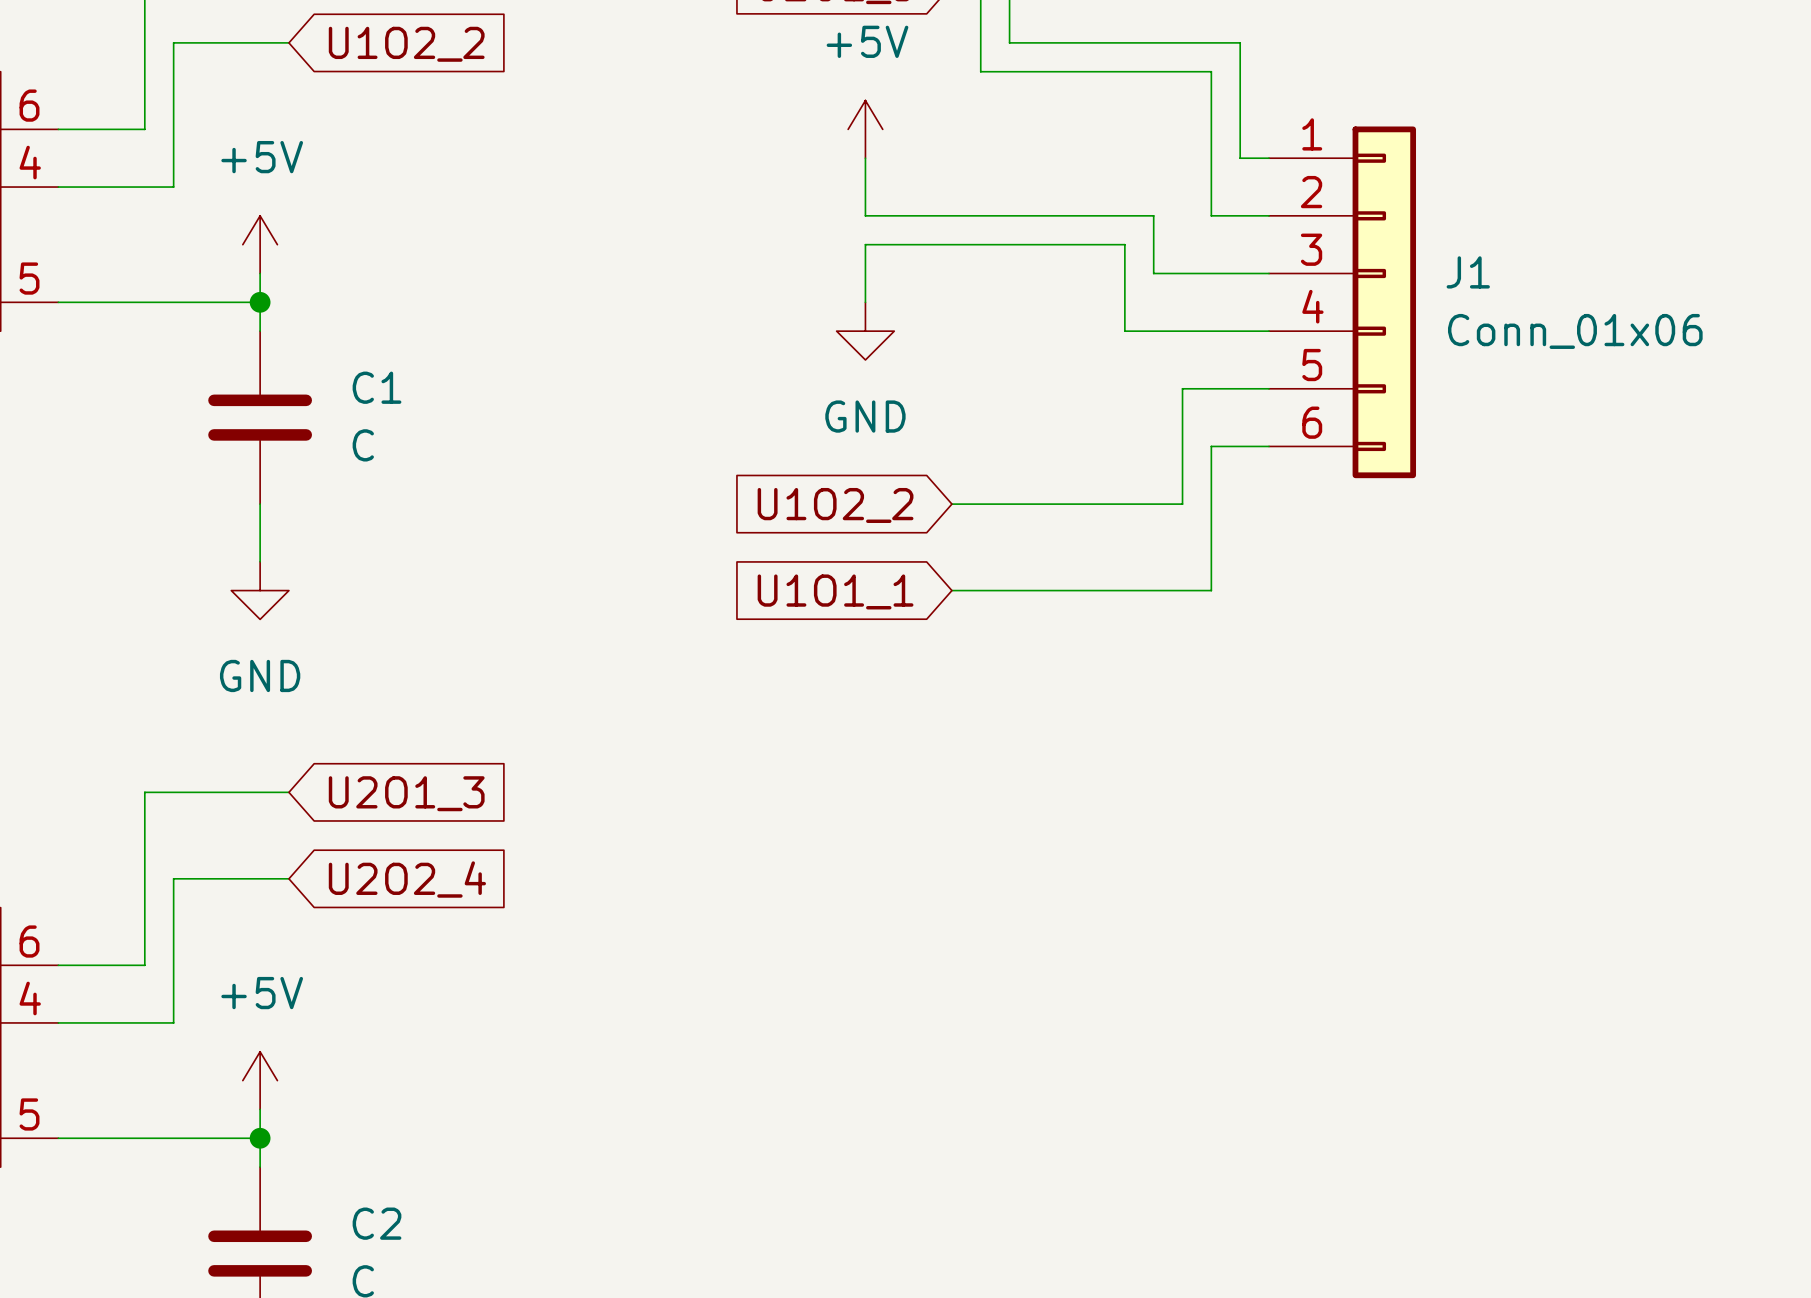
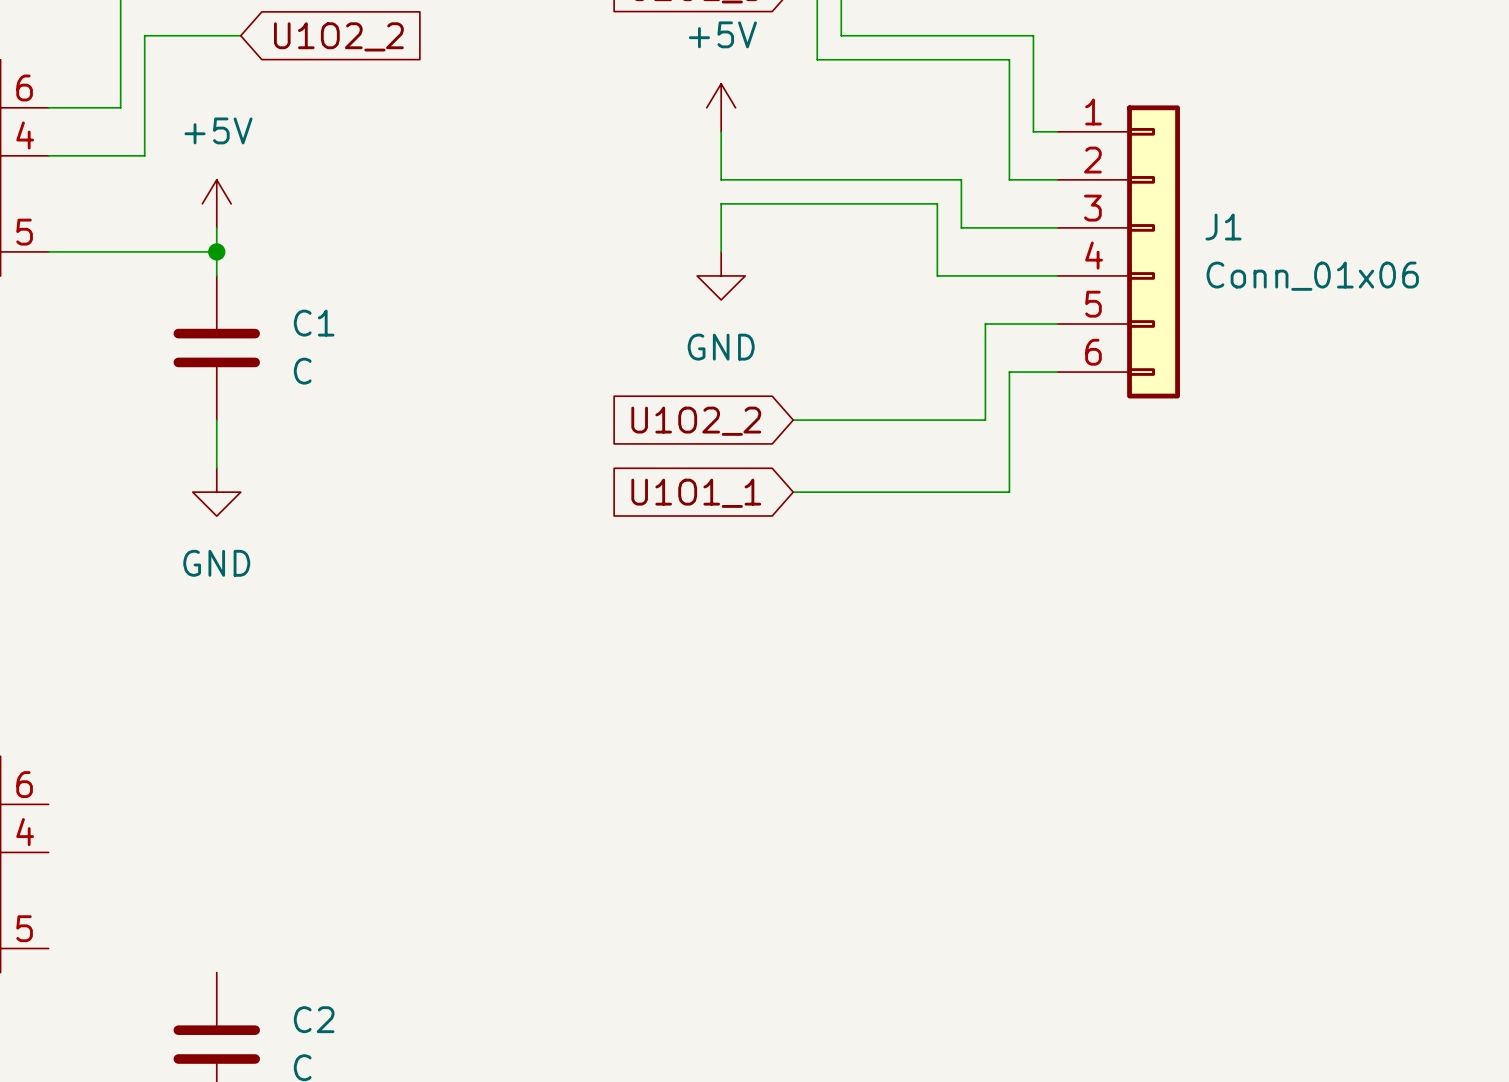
wire: (288, 792) (144, 792) (144, 965) (58, 965) -> none
global label: U2O1_3 (406, 793) -> none
wire: (288, 878) (173, 878) (173, 1022) (58, 1022) -> none
global label: U2O2_4 (407, 879) -> none
power symbol: +5V (260, 1080) -> none
wire: (260, 1109) (260, 1167) -> none
wire: (58, 1138) (260, 1138) -> none
junction: (260, 1138) -> none

